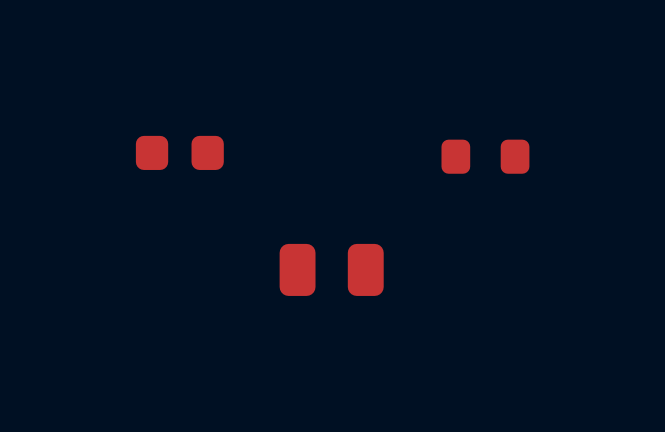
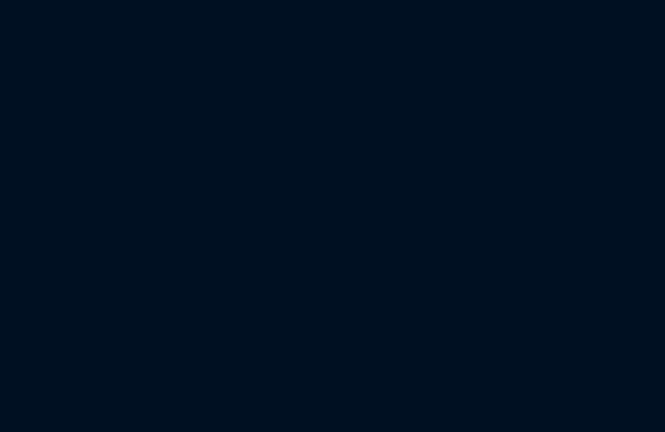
part: (179, 152) -> none
part: (485, 156) -> none
part: (331, 269) -> none

